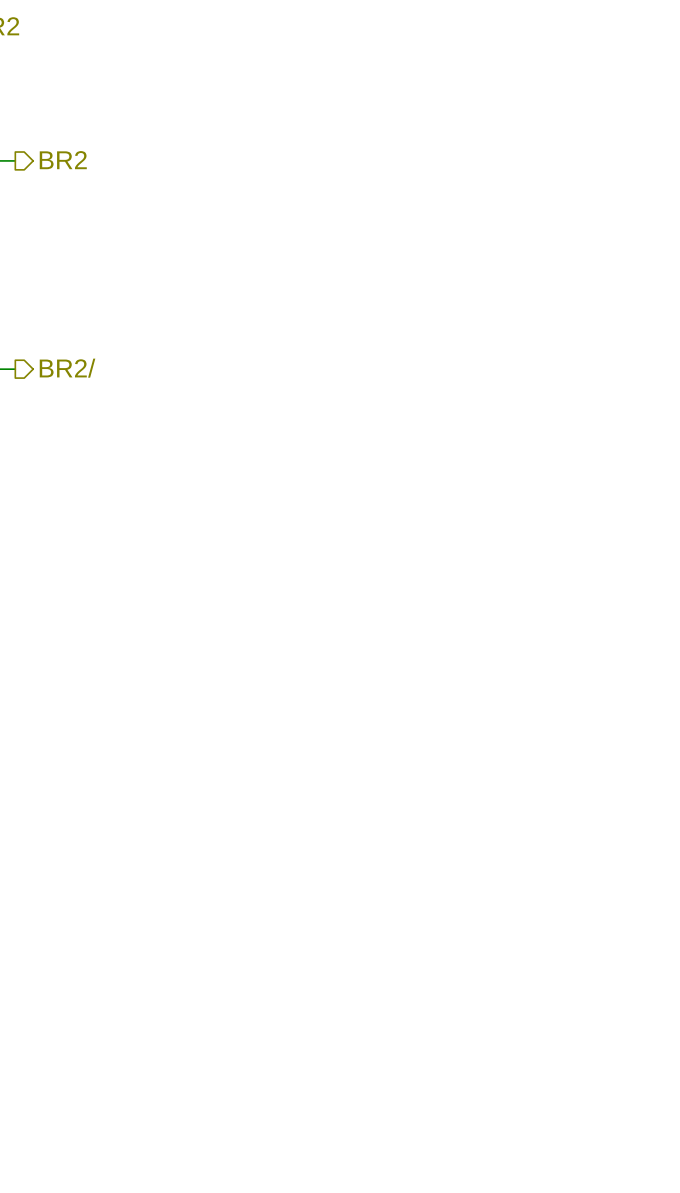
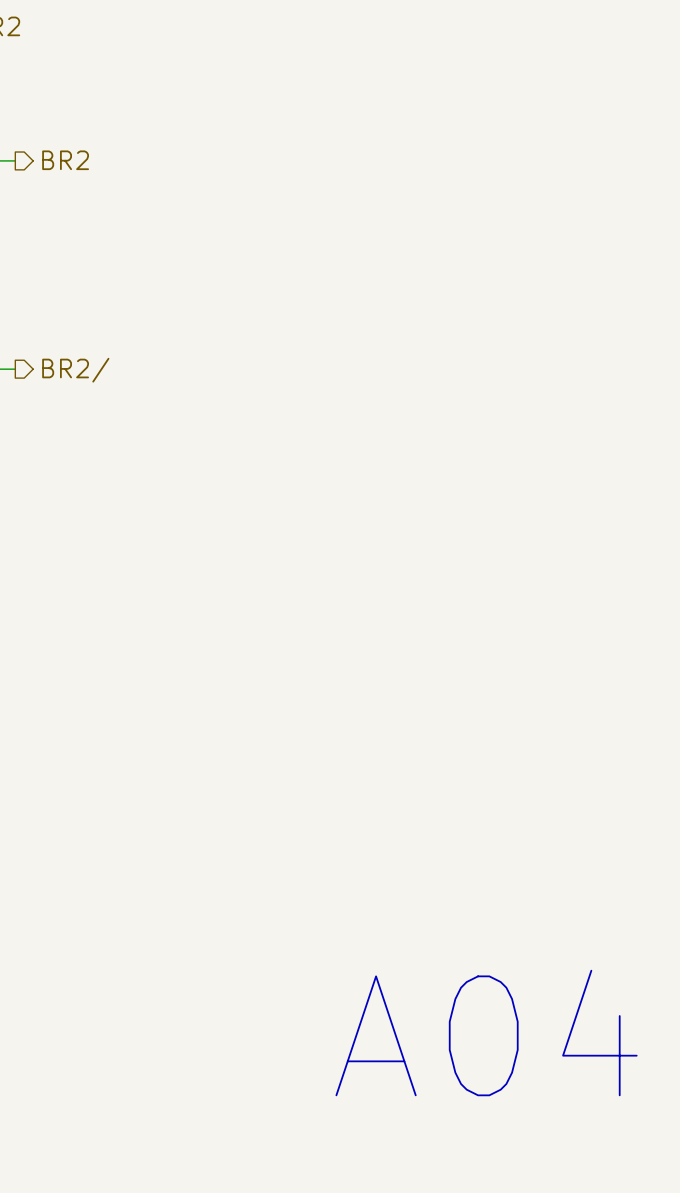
text: none -> A04 (486, 1033)

